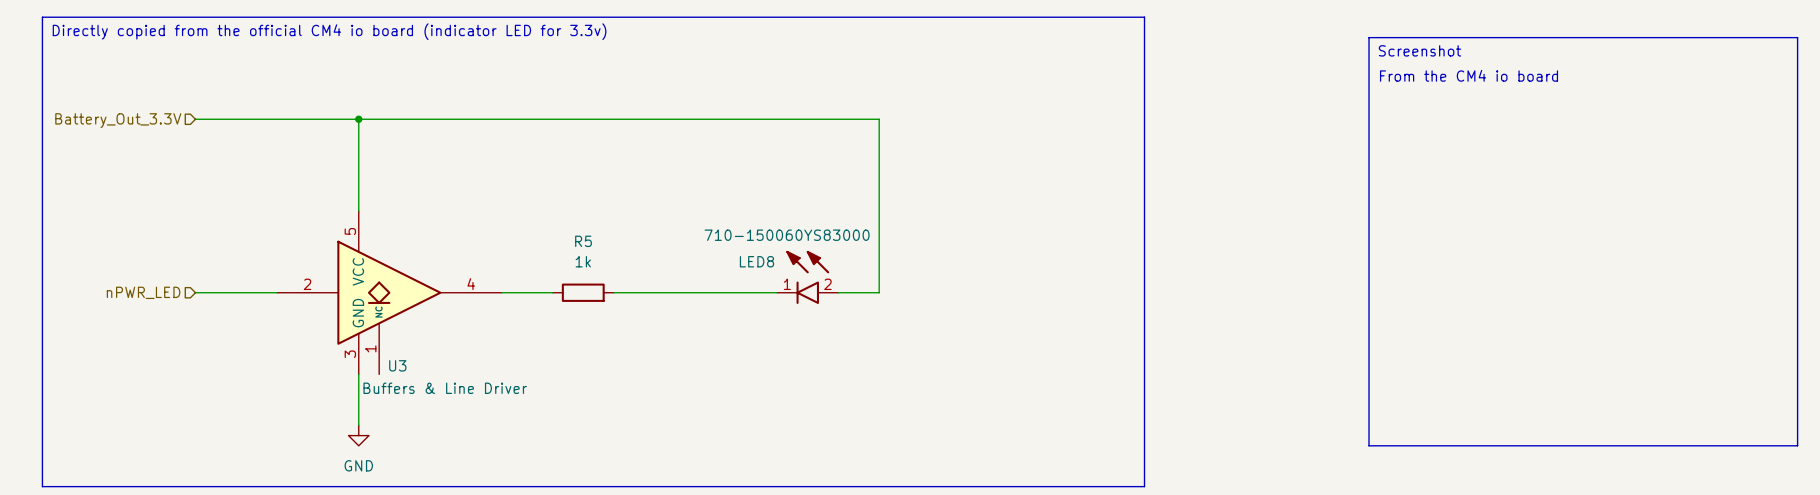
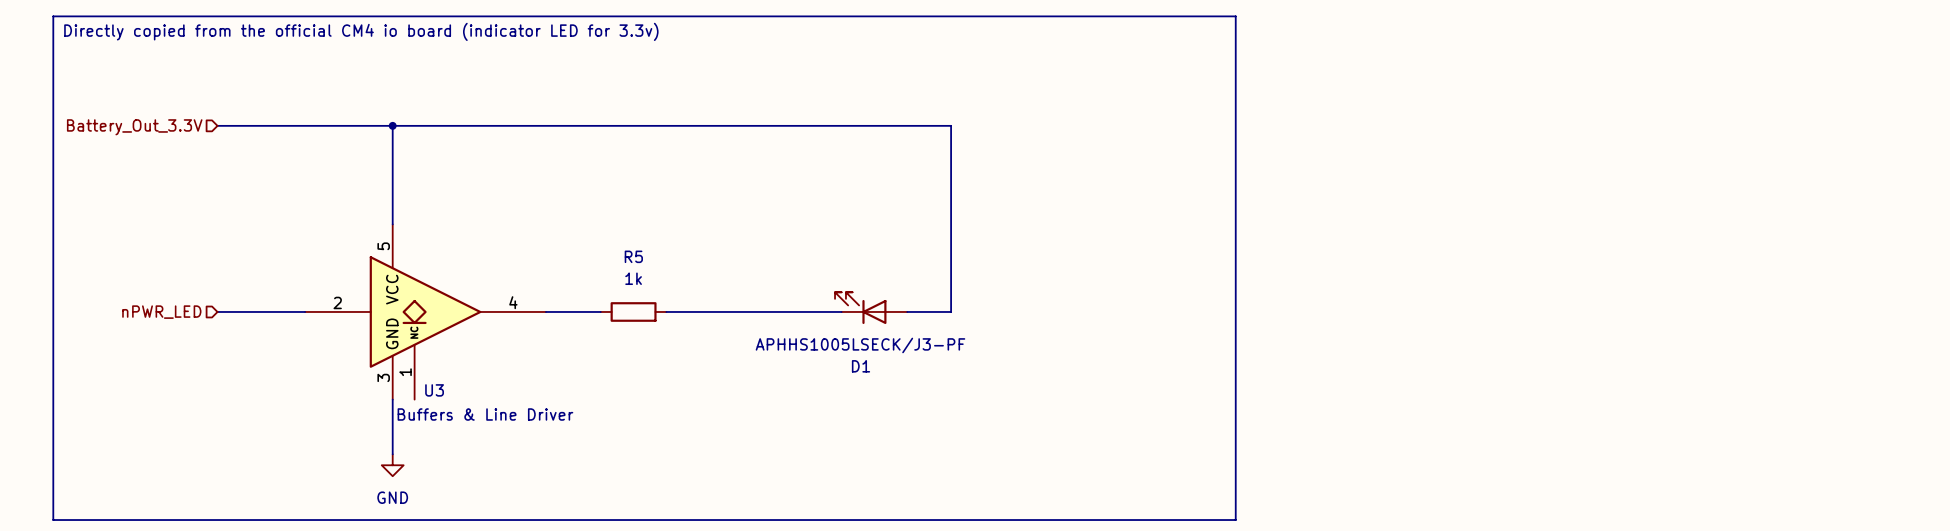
line: (1369, 37) (1797, 37) (1797, 445) (1369, 445) (1369, 37) -> none
text: Screenshot (1419, 50) -> none
text: From the CM4 io board (1469, 75) -> none
LED8: 710-150060YS83000 (807, 277) -> none
D1: none -> APHHS1005LSECK/J3-PF (871, 308)

